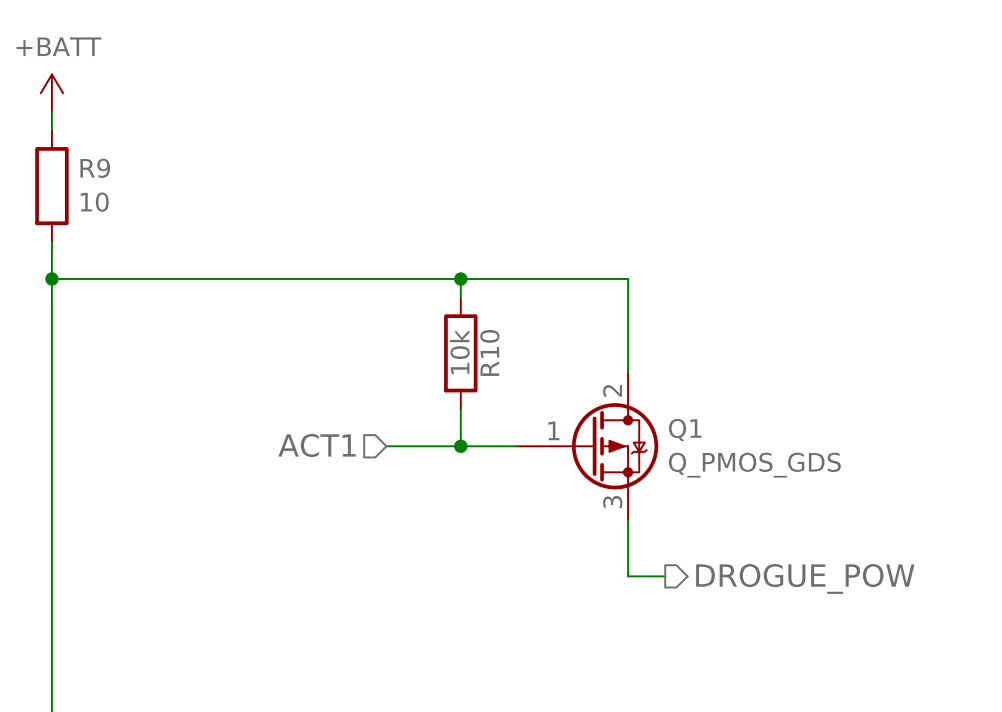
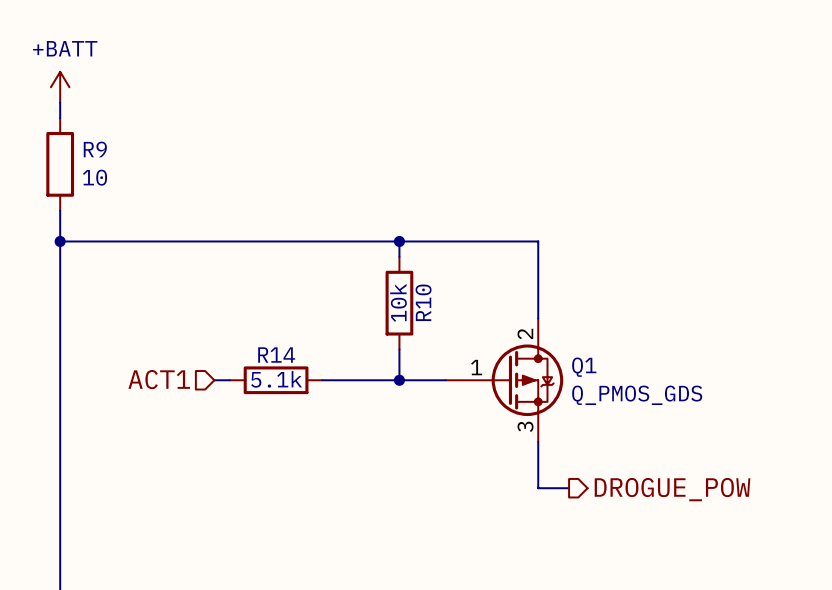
hierarchical label position: ACT1 (317, 445) -> ACT1 (159, 379)
wire: none -> (214, 380) (229, 380)
R14: none -> 5.1k (276, 380)
wire: none -> (322, 380) (337, 380)

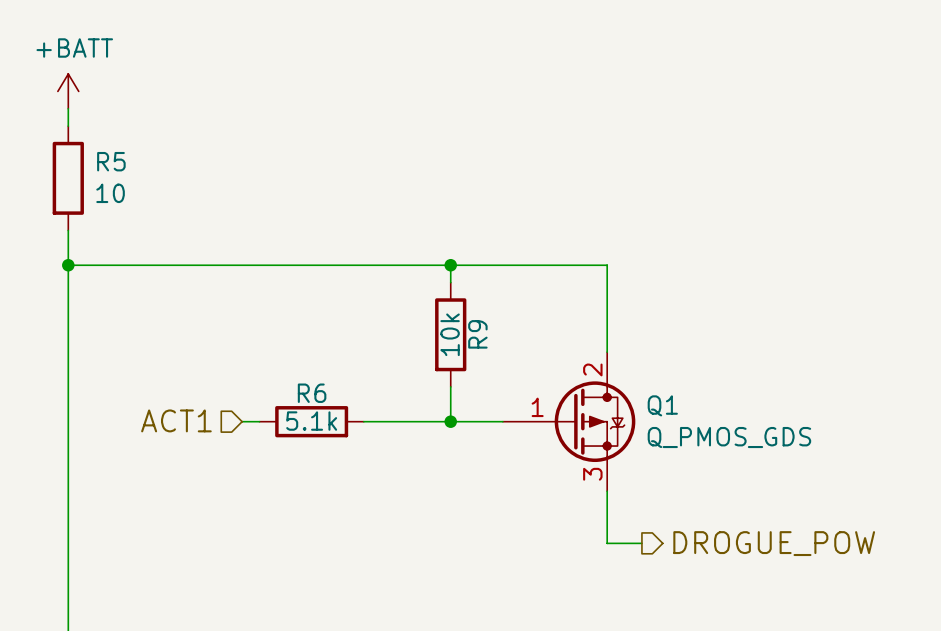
R9 name: R9 (95, 149) -> R5 (111, 161)
R10 name: R10 (423, 302) -> R9 (477, 334)
R14 name: R14 (276, 355) -> R6 (312, 393)

